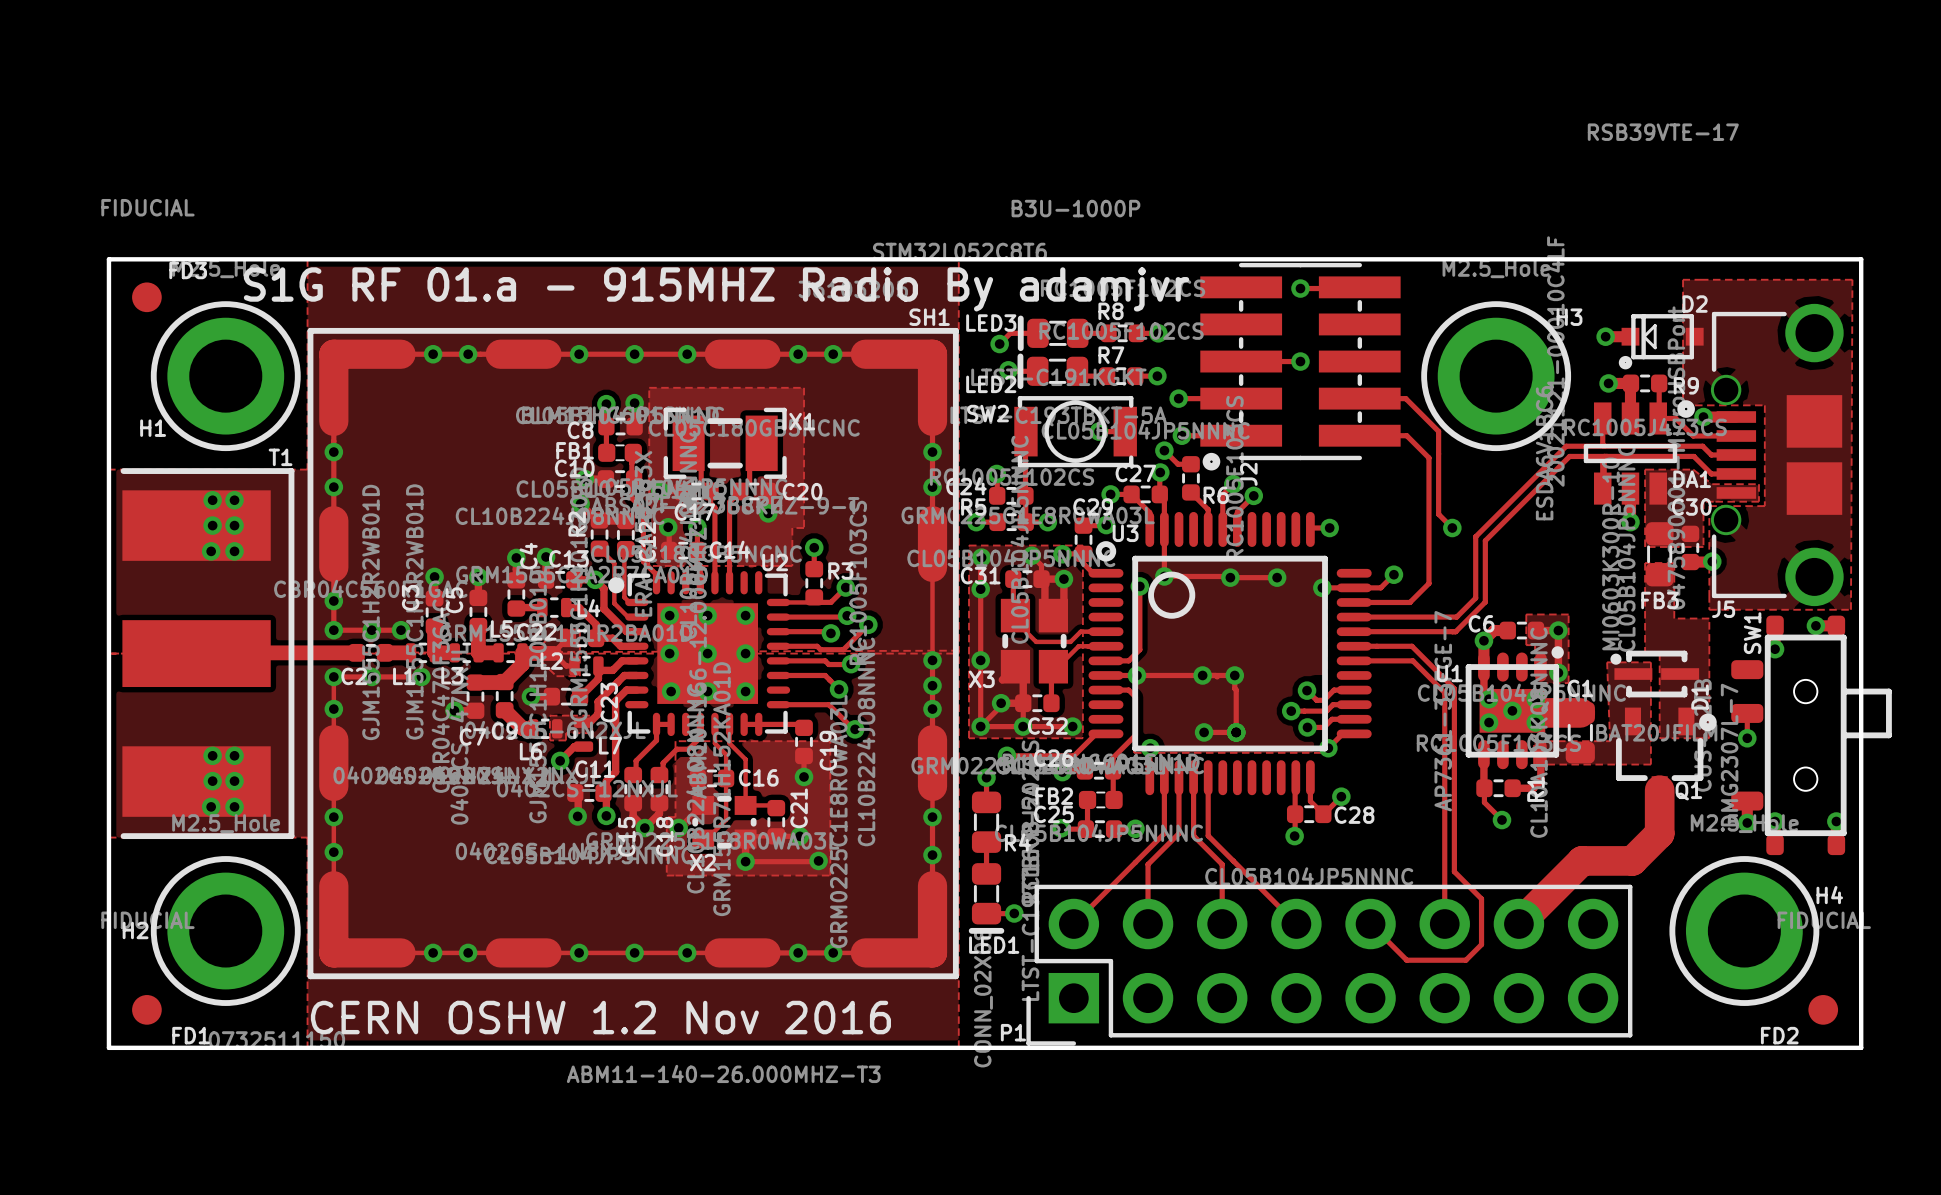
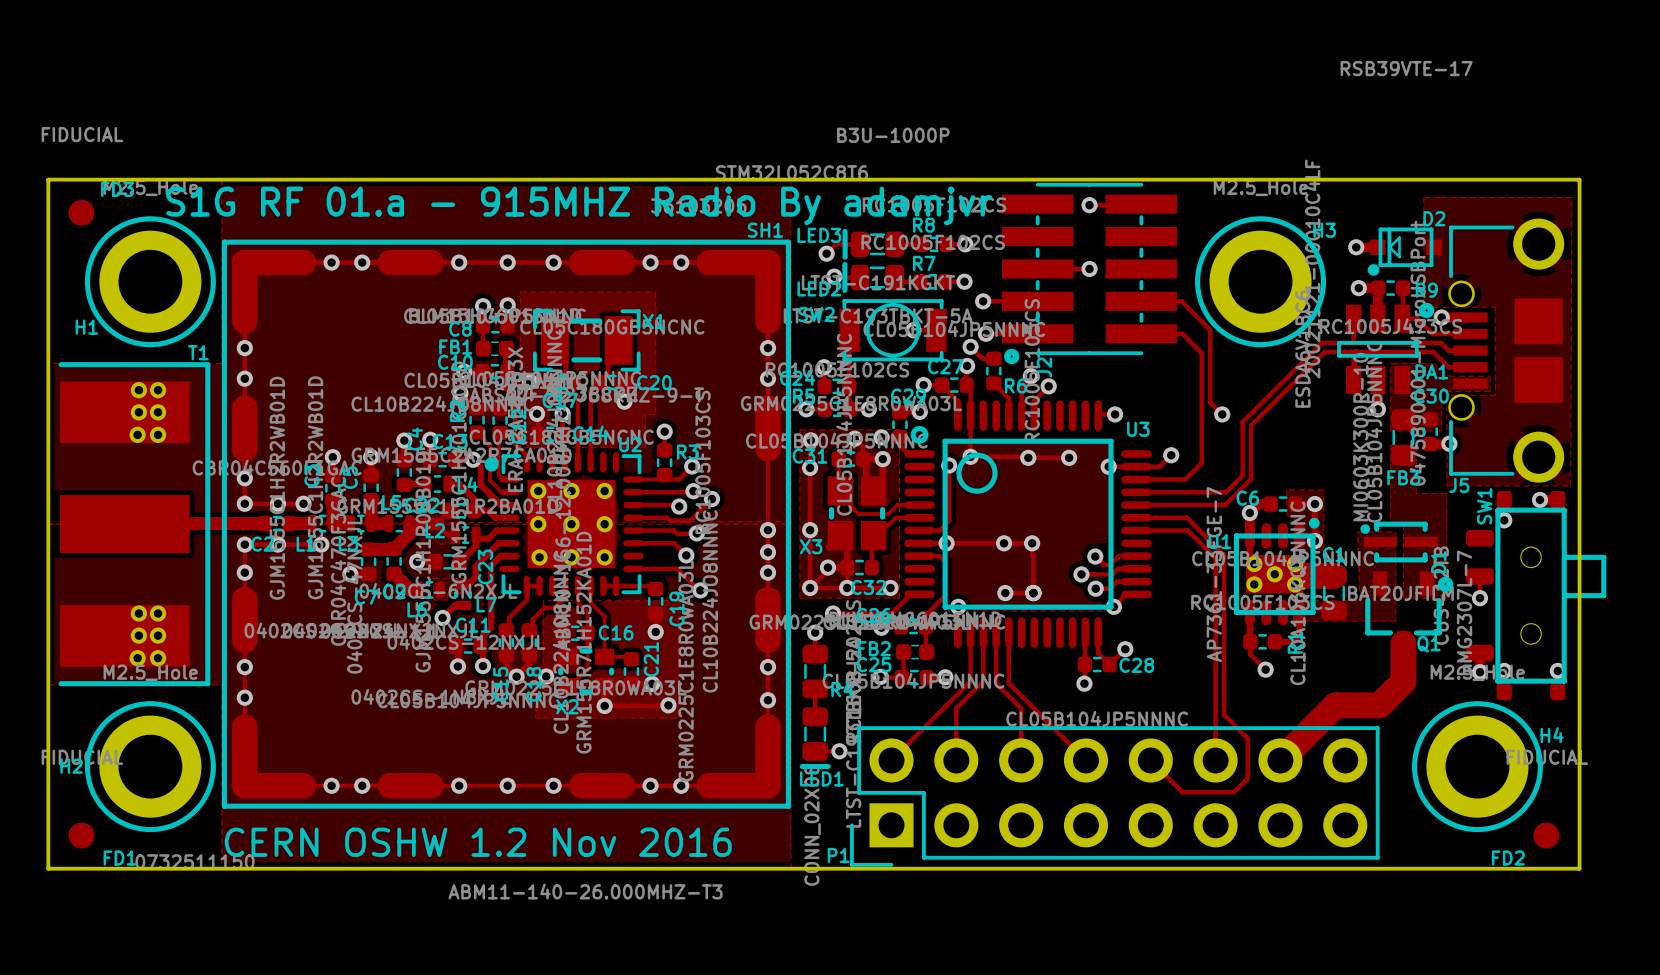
U3 name position: U3 (1125, 533) -> U3 (1138, 429)

